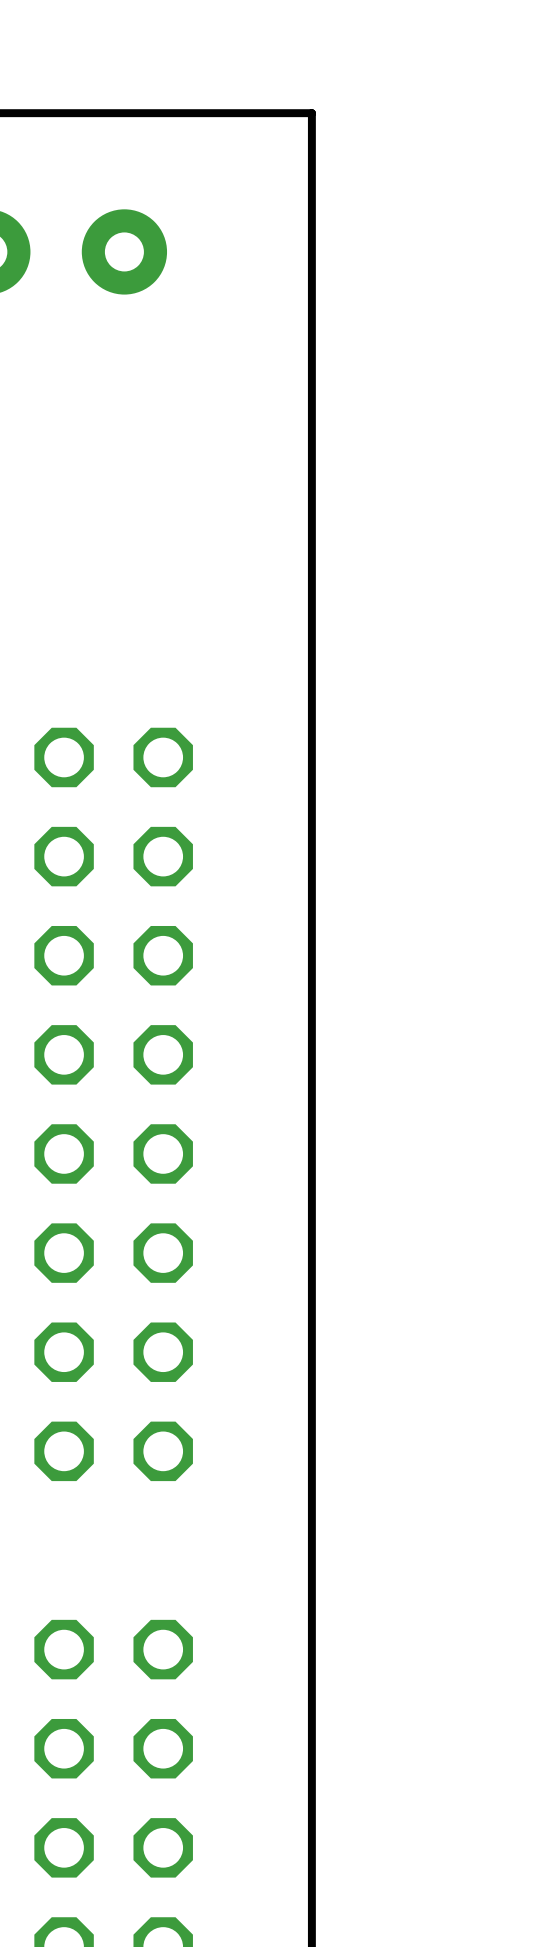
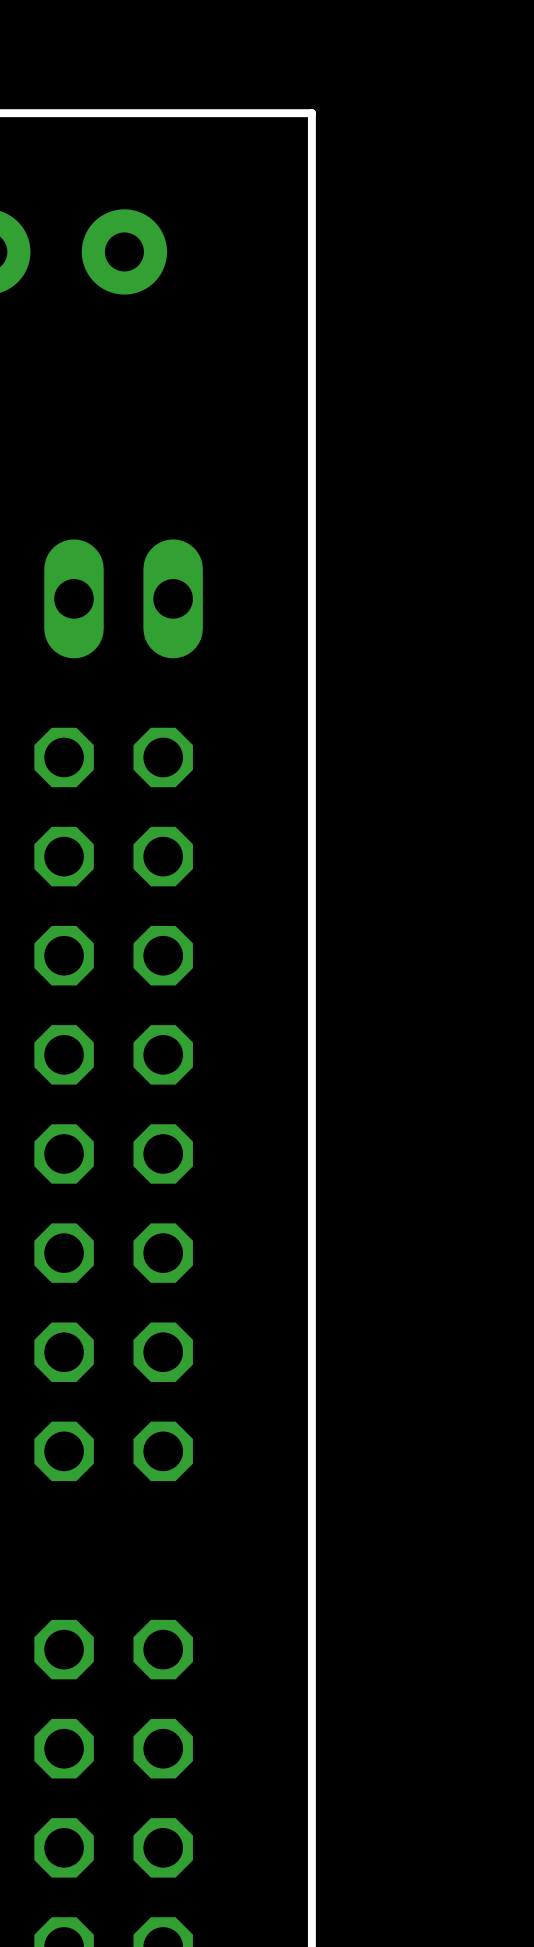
part: none -> (123, 598)

